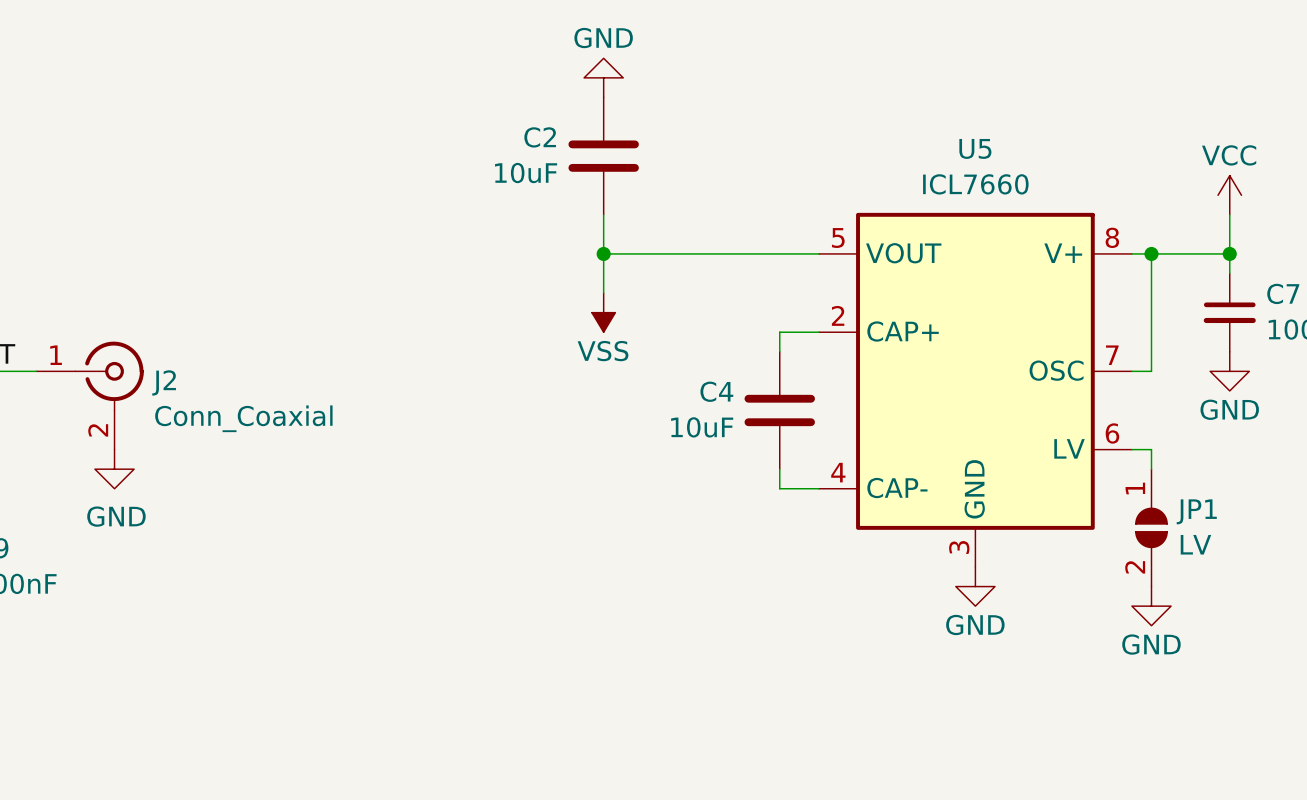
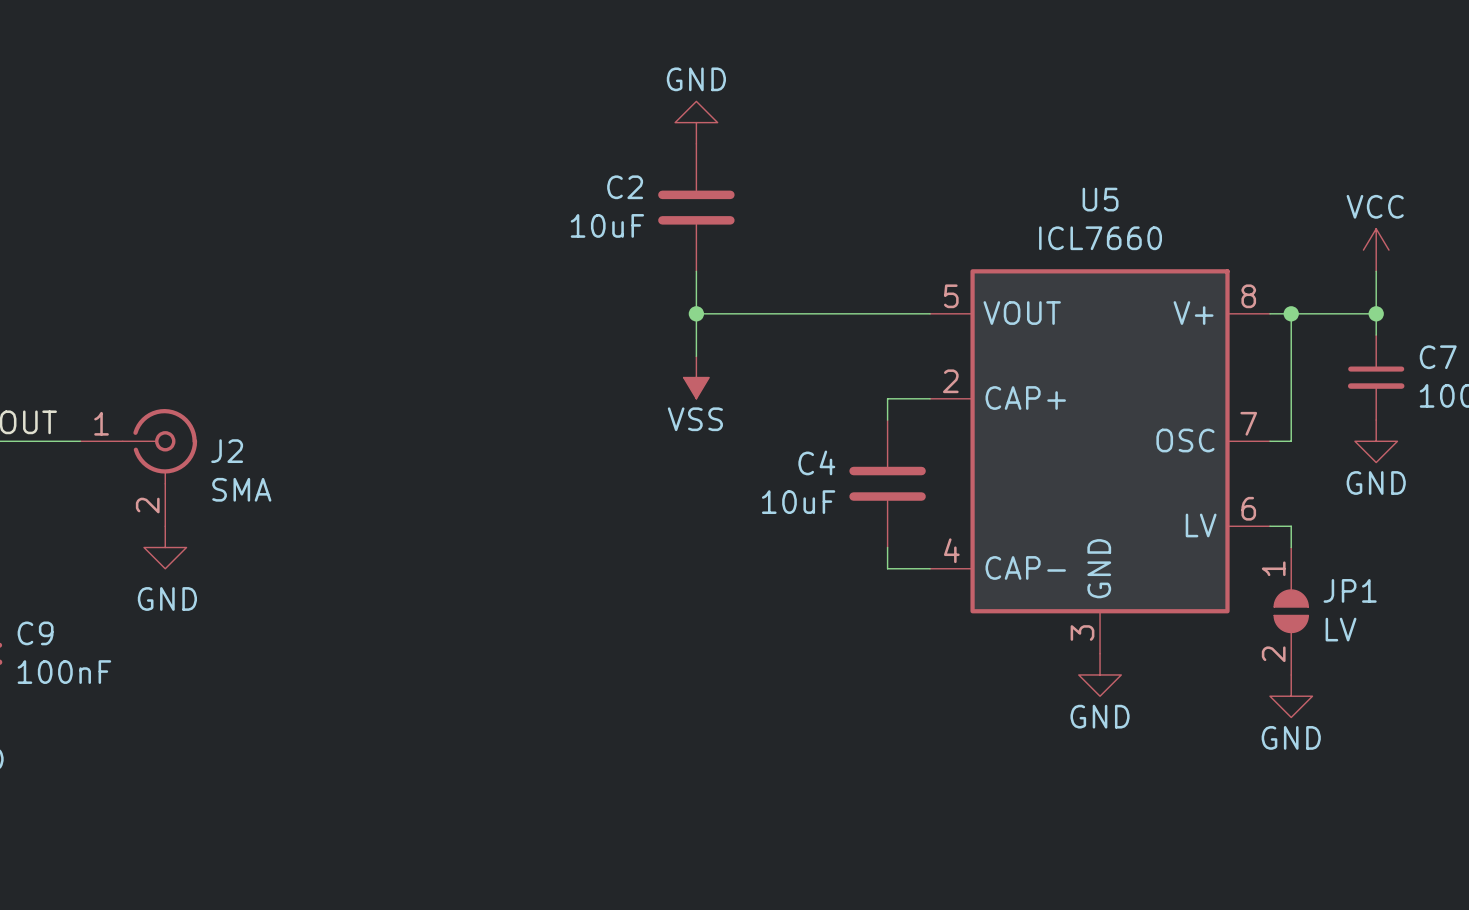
J2 value: Conn_Coaxial (243, 418) -> SMA (241, 489)

